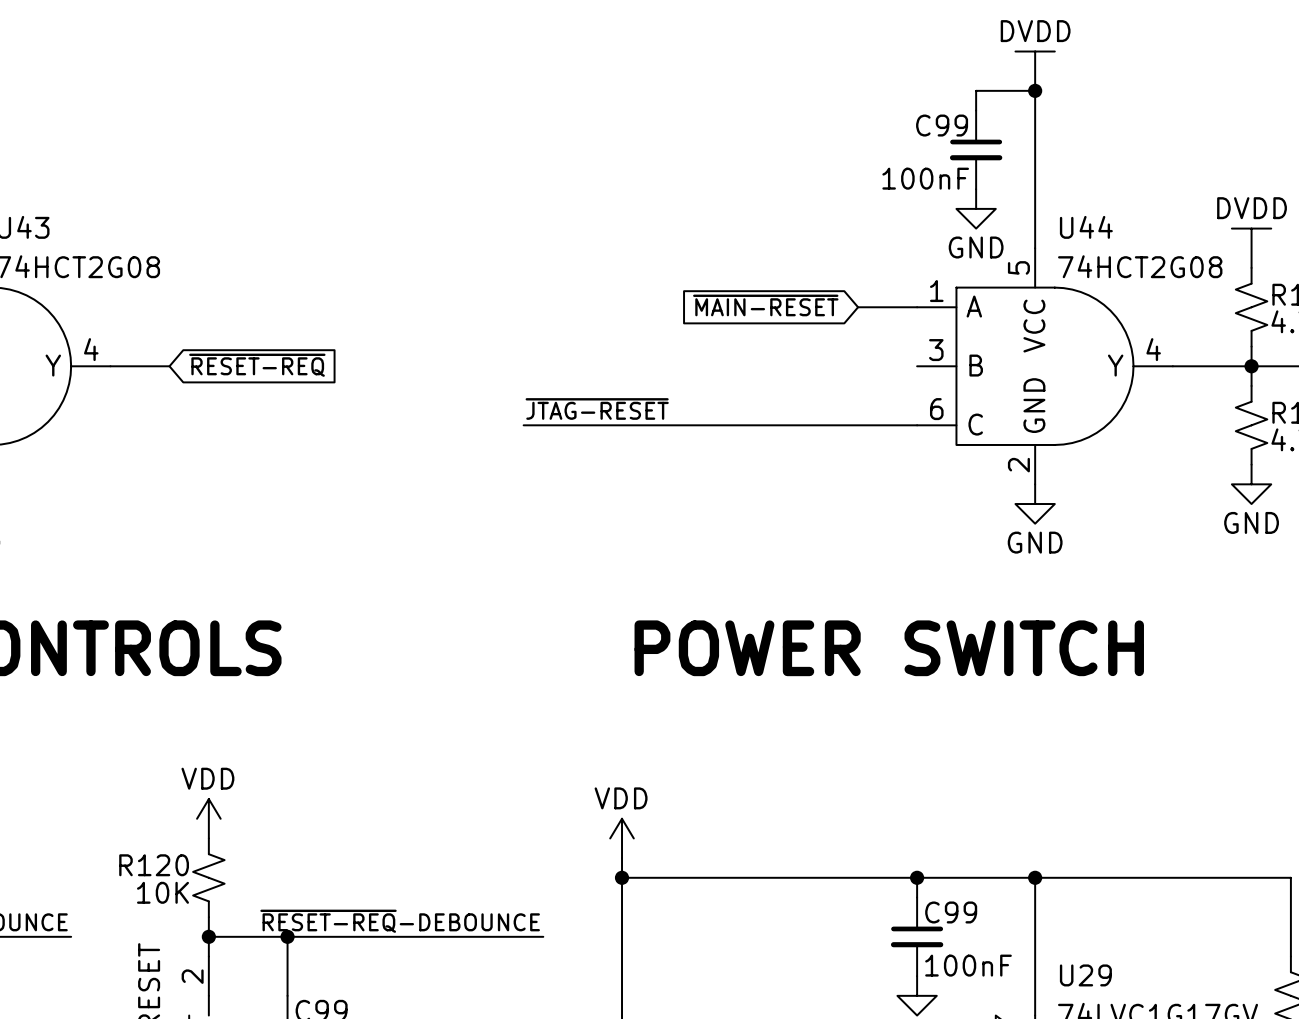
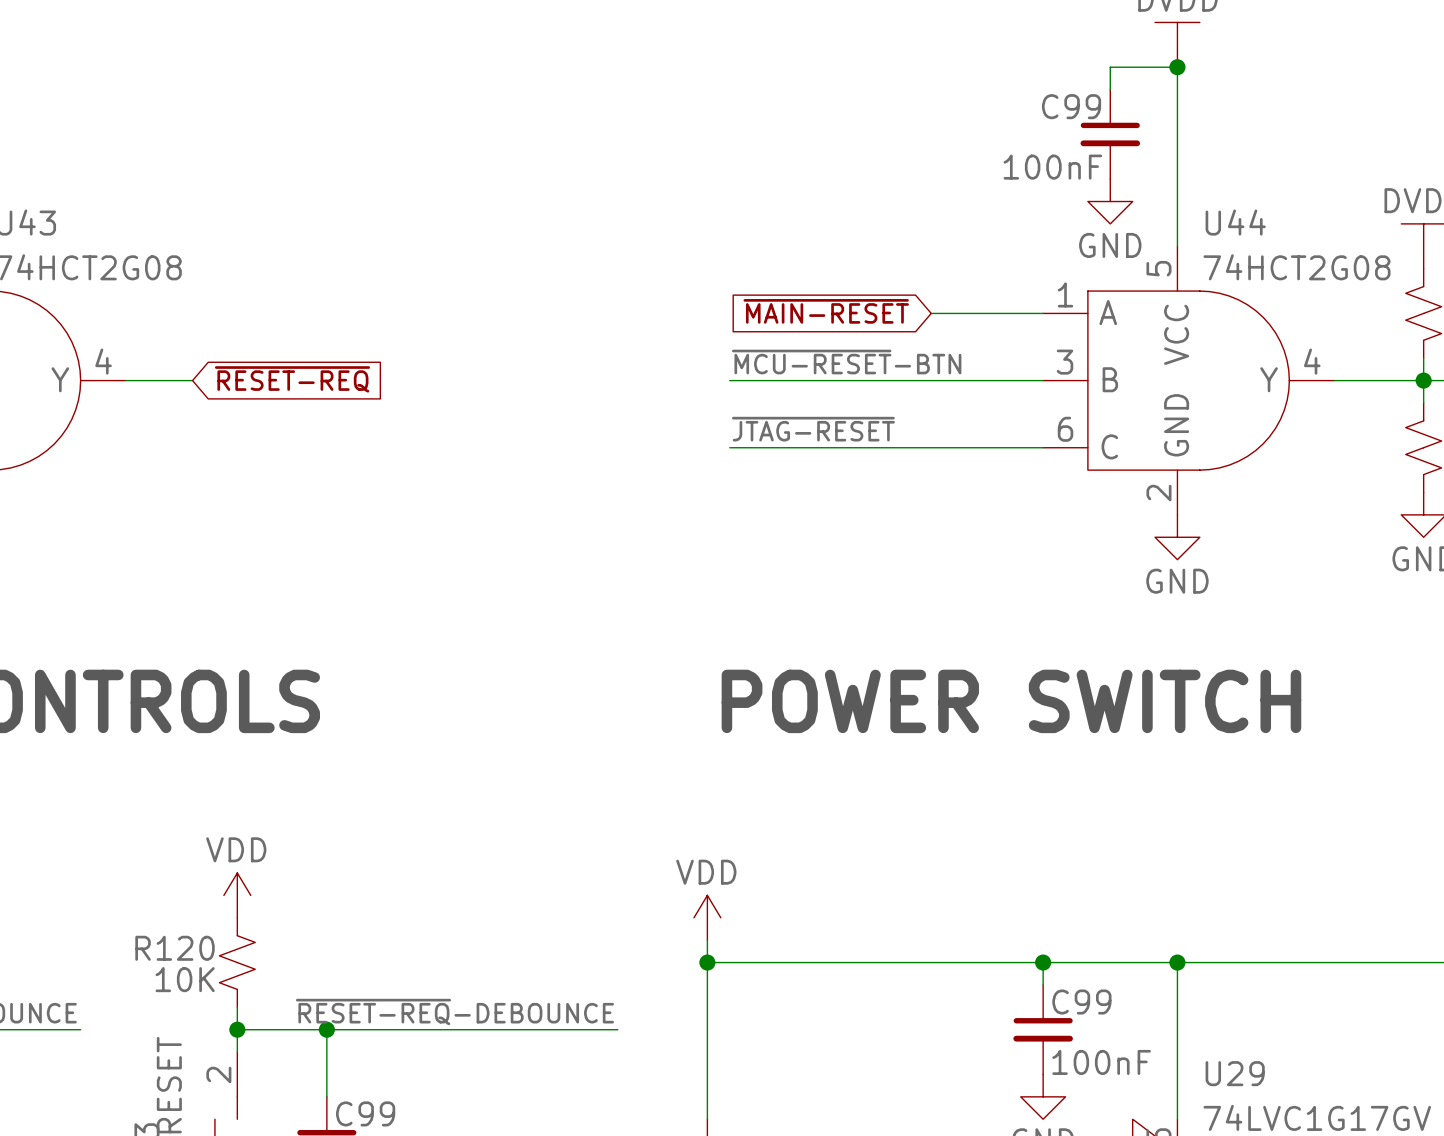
global label position: ~{MAIN-RESET} (765, 305) -> ~{MAIN-RESET} (826, 311)
wire: none -> (931, 313) (975, 313)
label: none -> ~{MCU-RESET}-BTN (846, 362)
wire: none -> (729, 380) (1043, 380)
label position: ~{JTAG-RESET} (597, 408) -> ~{JTAG-RESET} (813, 429)
wire: (523, 425) (641, 425) -> none

